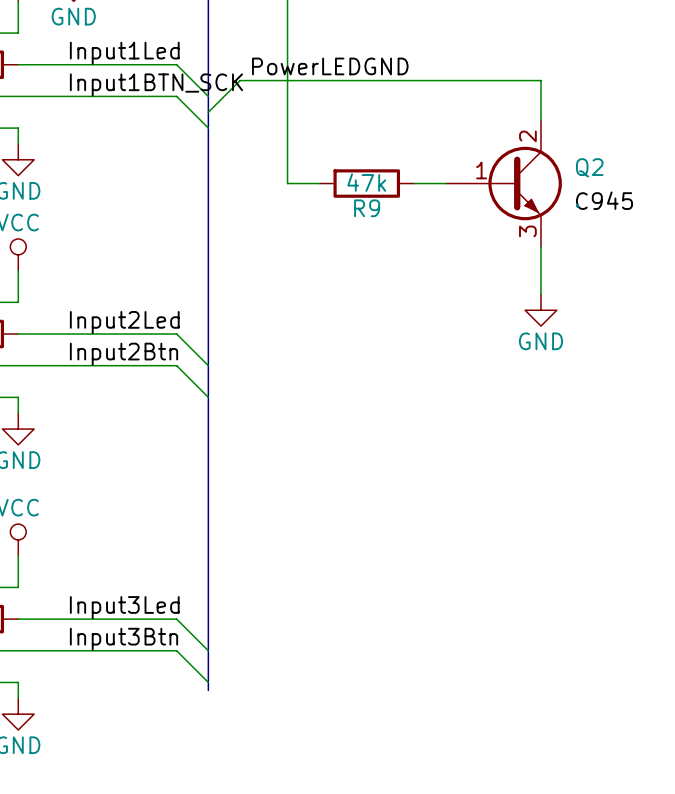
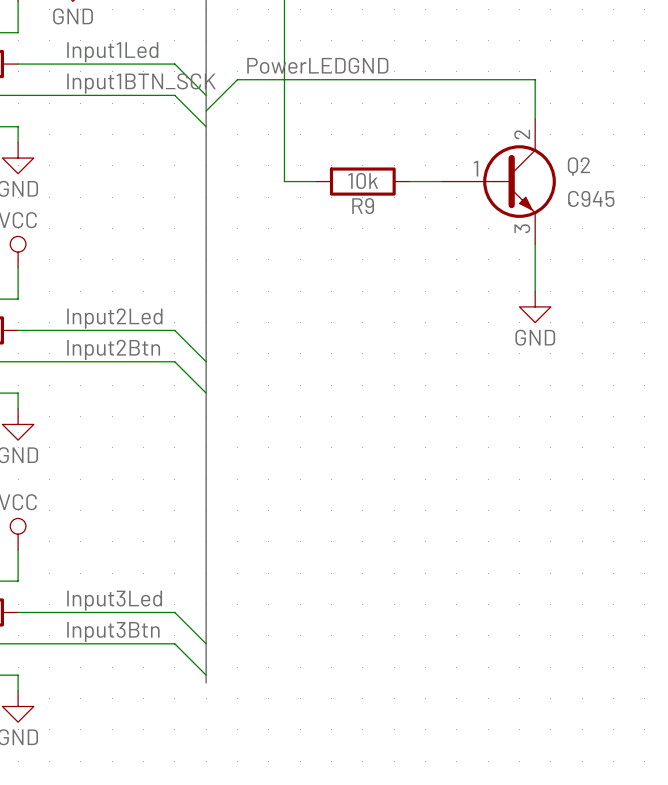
R9 value: 47k (366, 182) -> 10k (363, 180)

